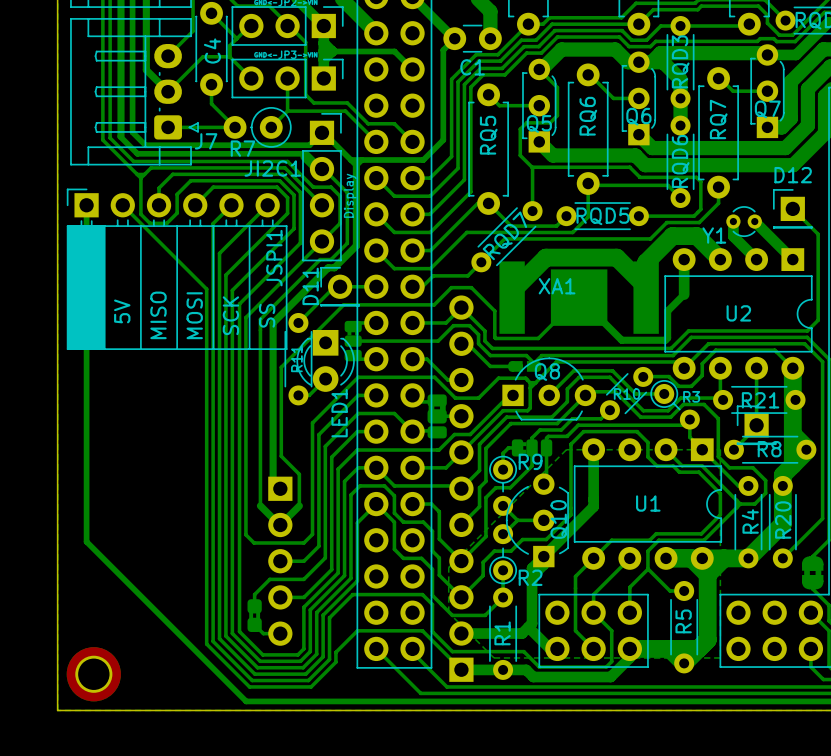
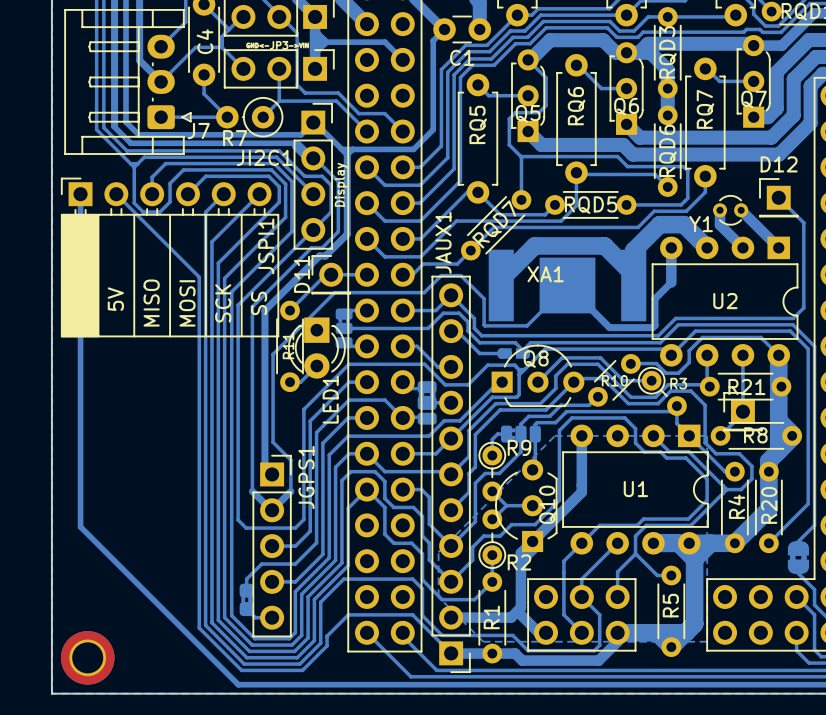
JAUX1 side: bottom (461, 488) -> top (451, 474)
JGPS1 side: bottom (280, 561) -> top (272, 546)

